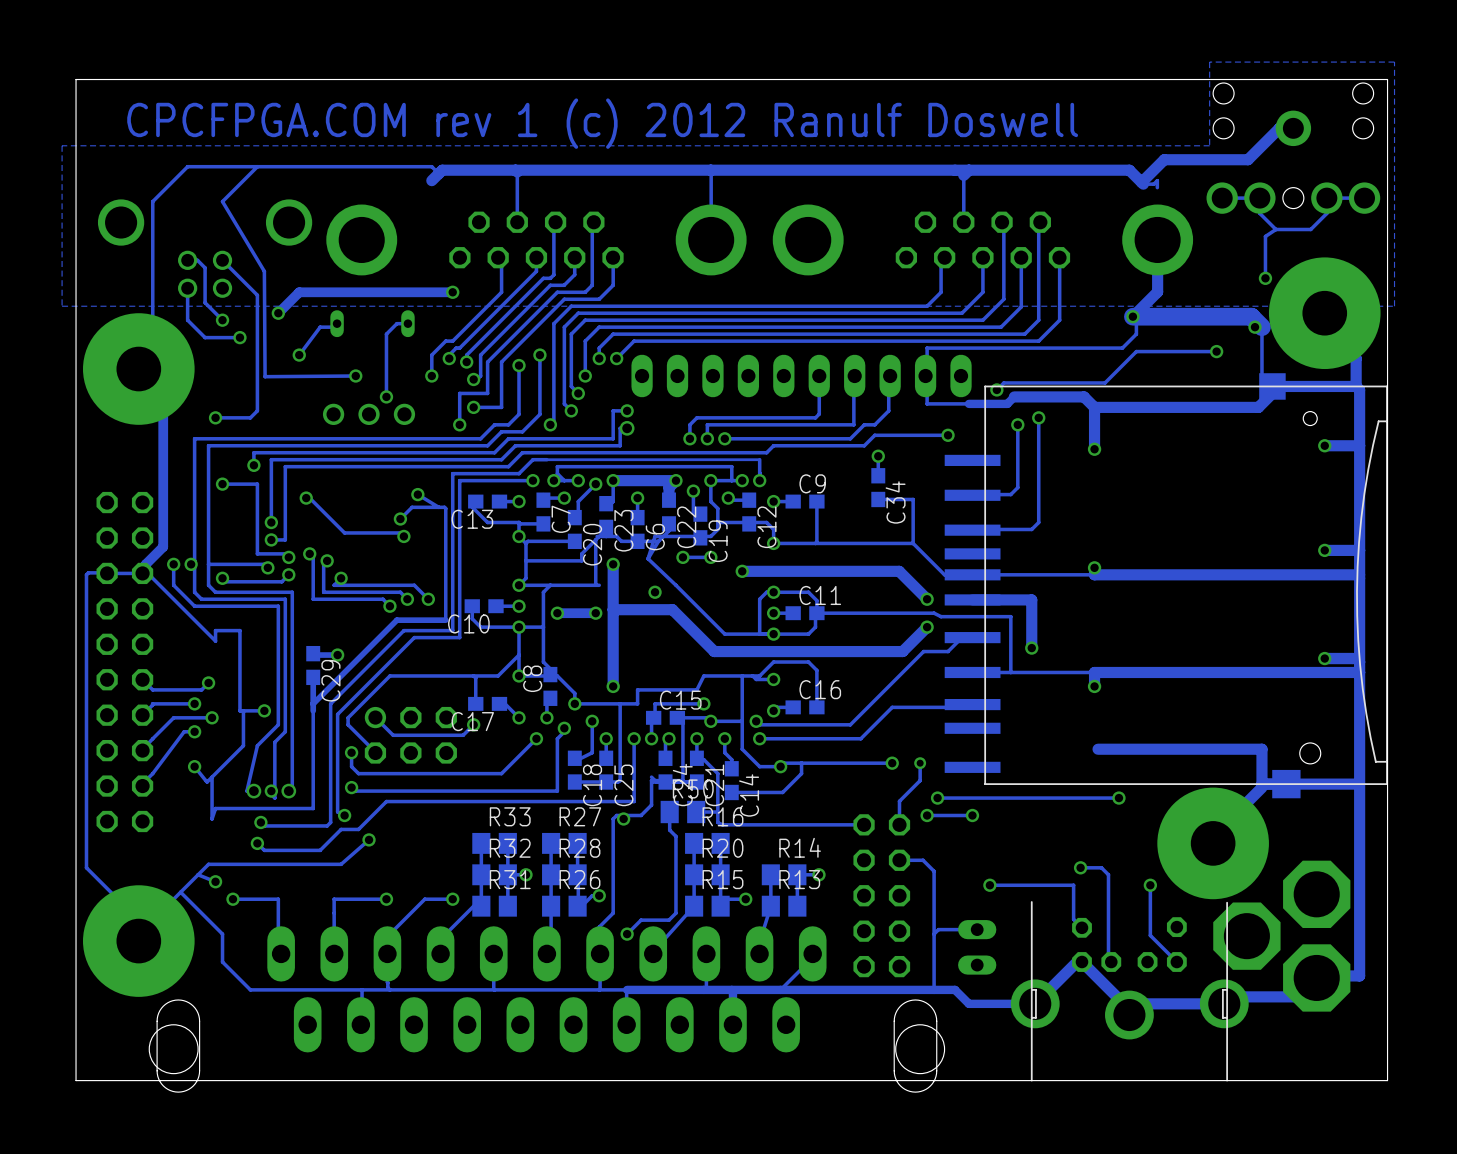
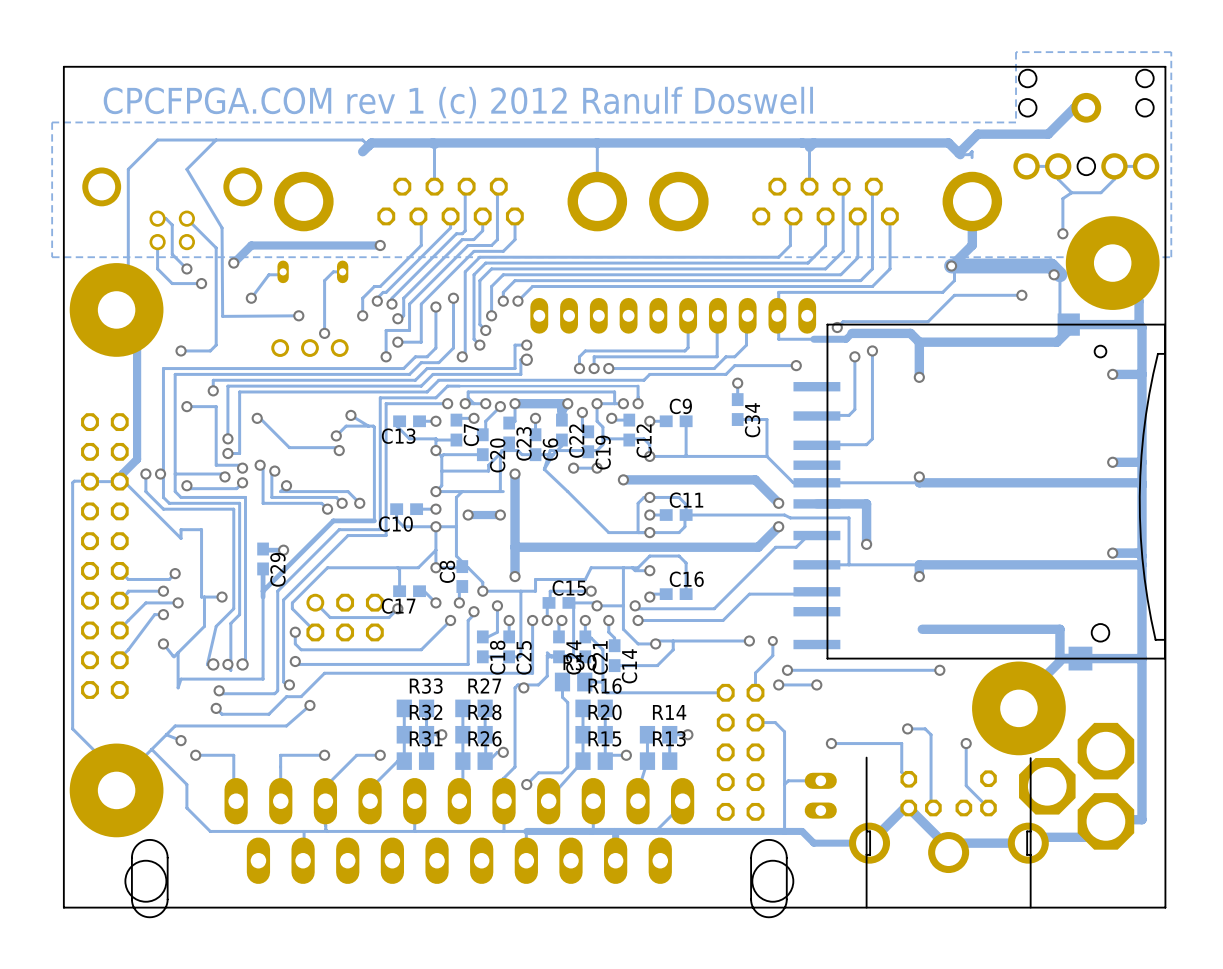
via: (655, 592) -> none
track: (613, 609) (672, 609) (714, 651) -> (515, 547) (599, 547)

